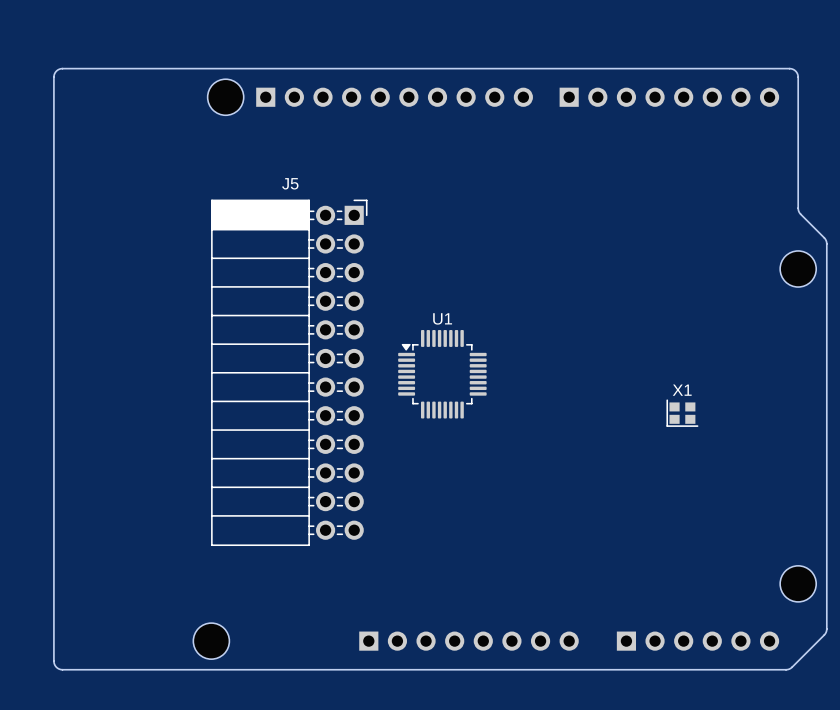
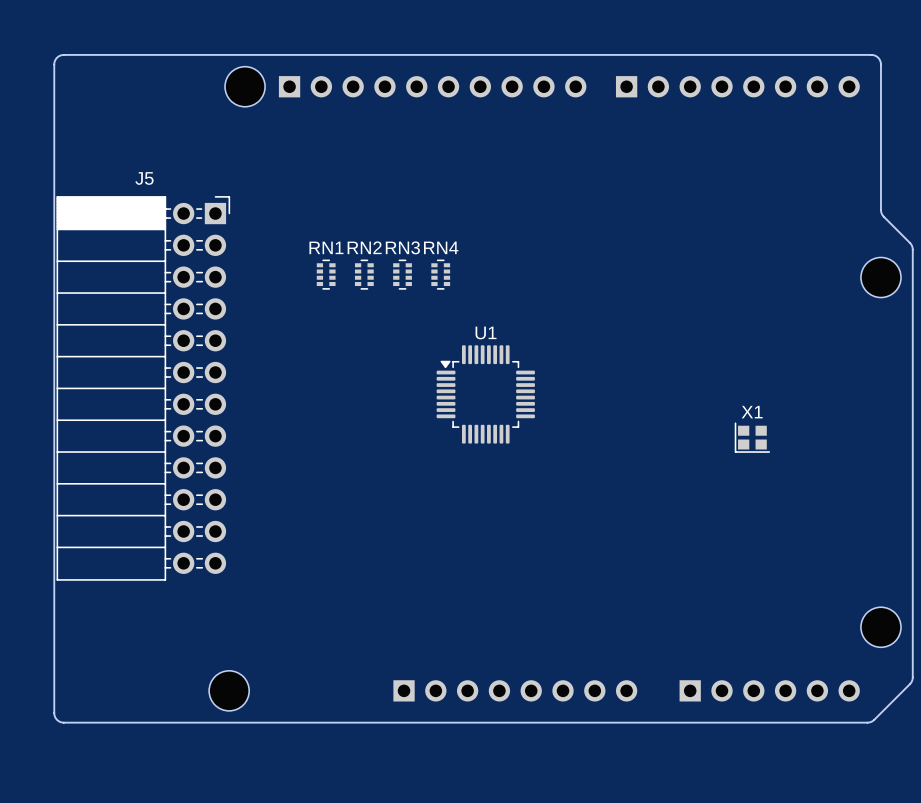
RN1: none -> (326, 274)
RN2: none -> (364, 274)
RN3: none -> (402, 274)
RN4: none -> (440, 274)
J5 position: (289, 372) -> (143, 388)

